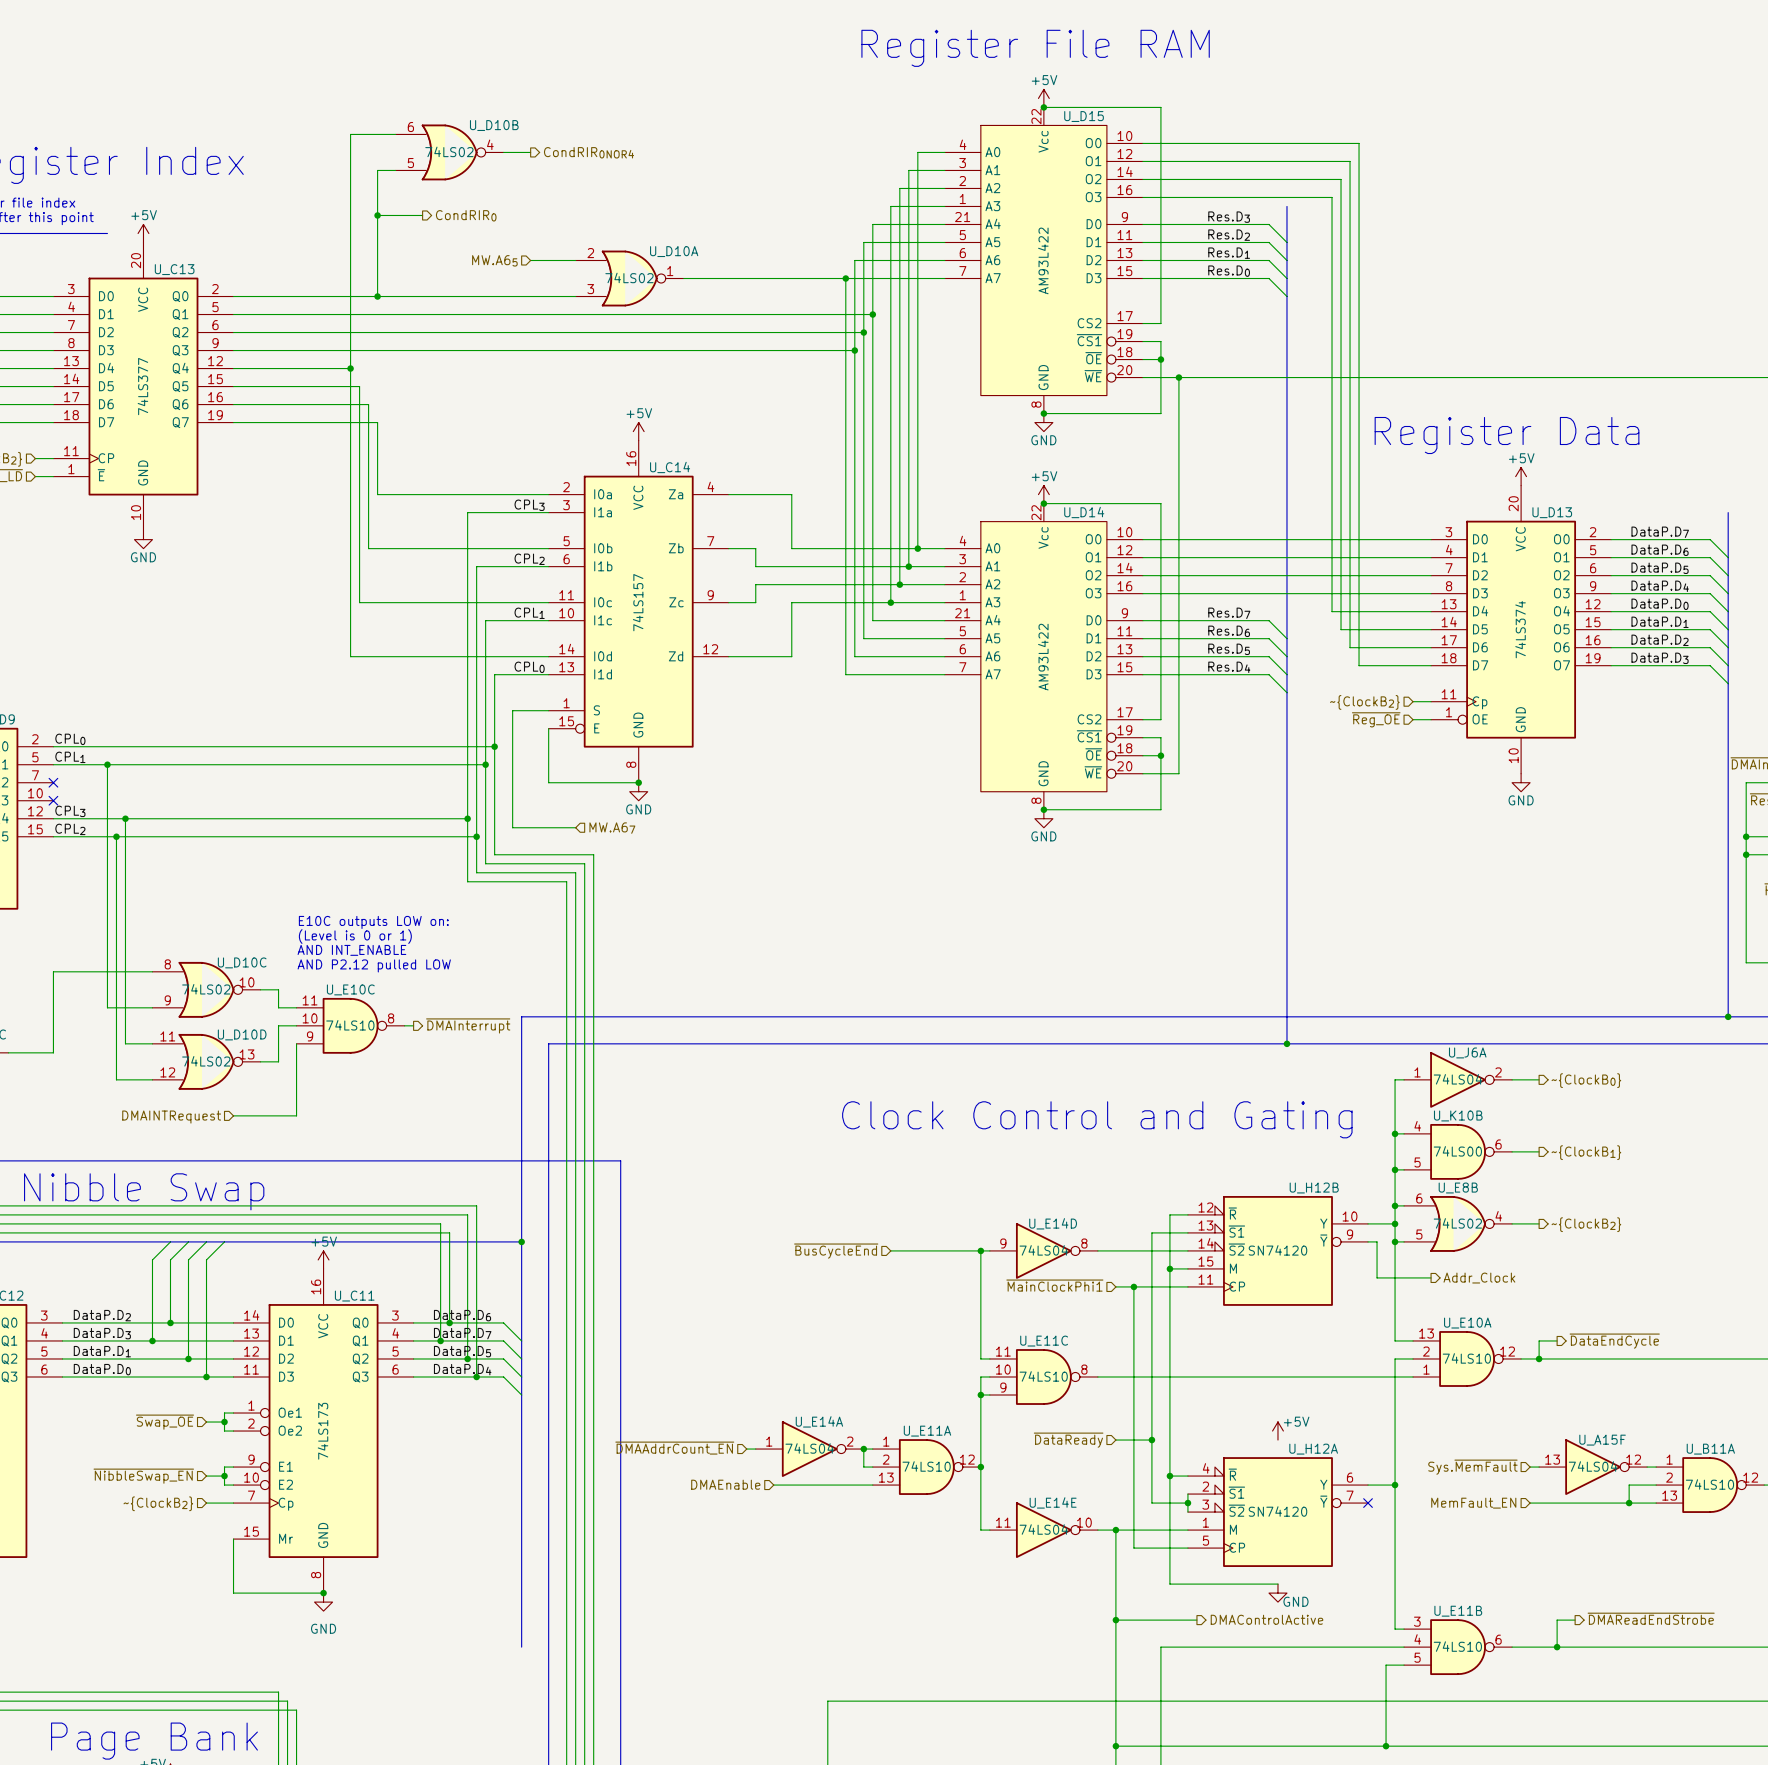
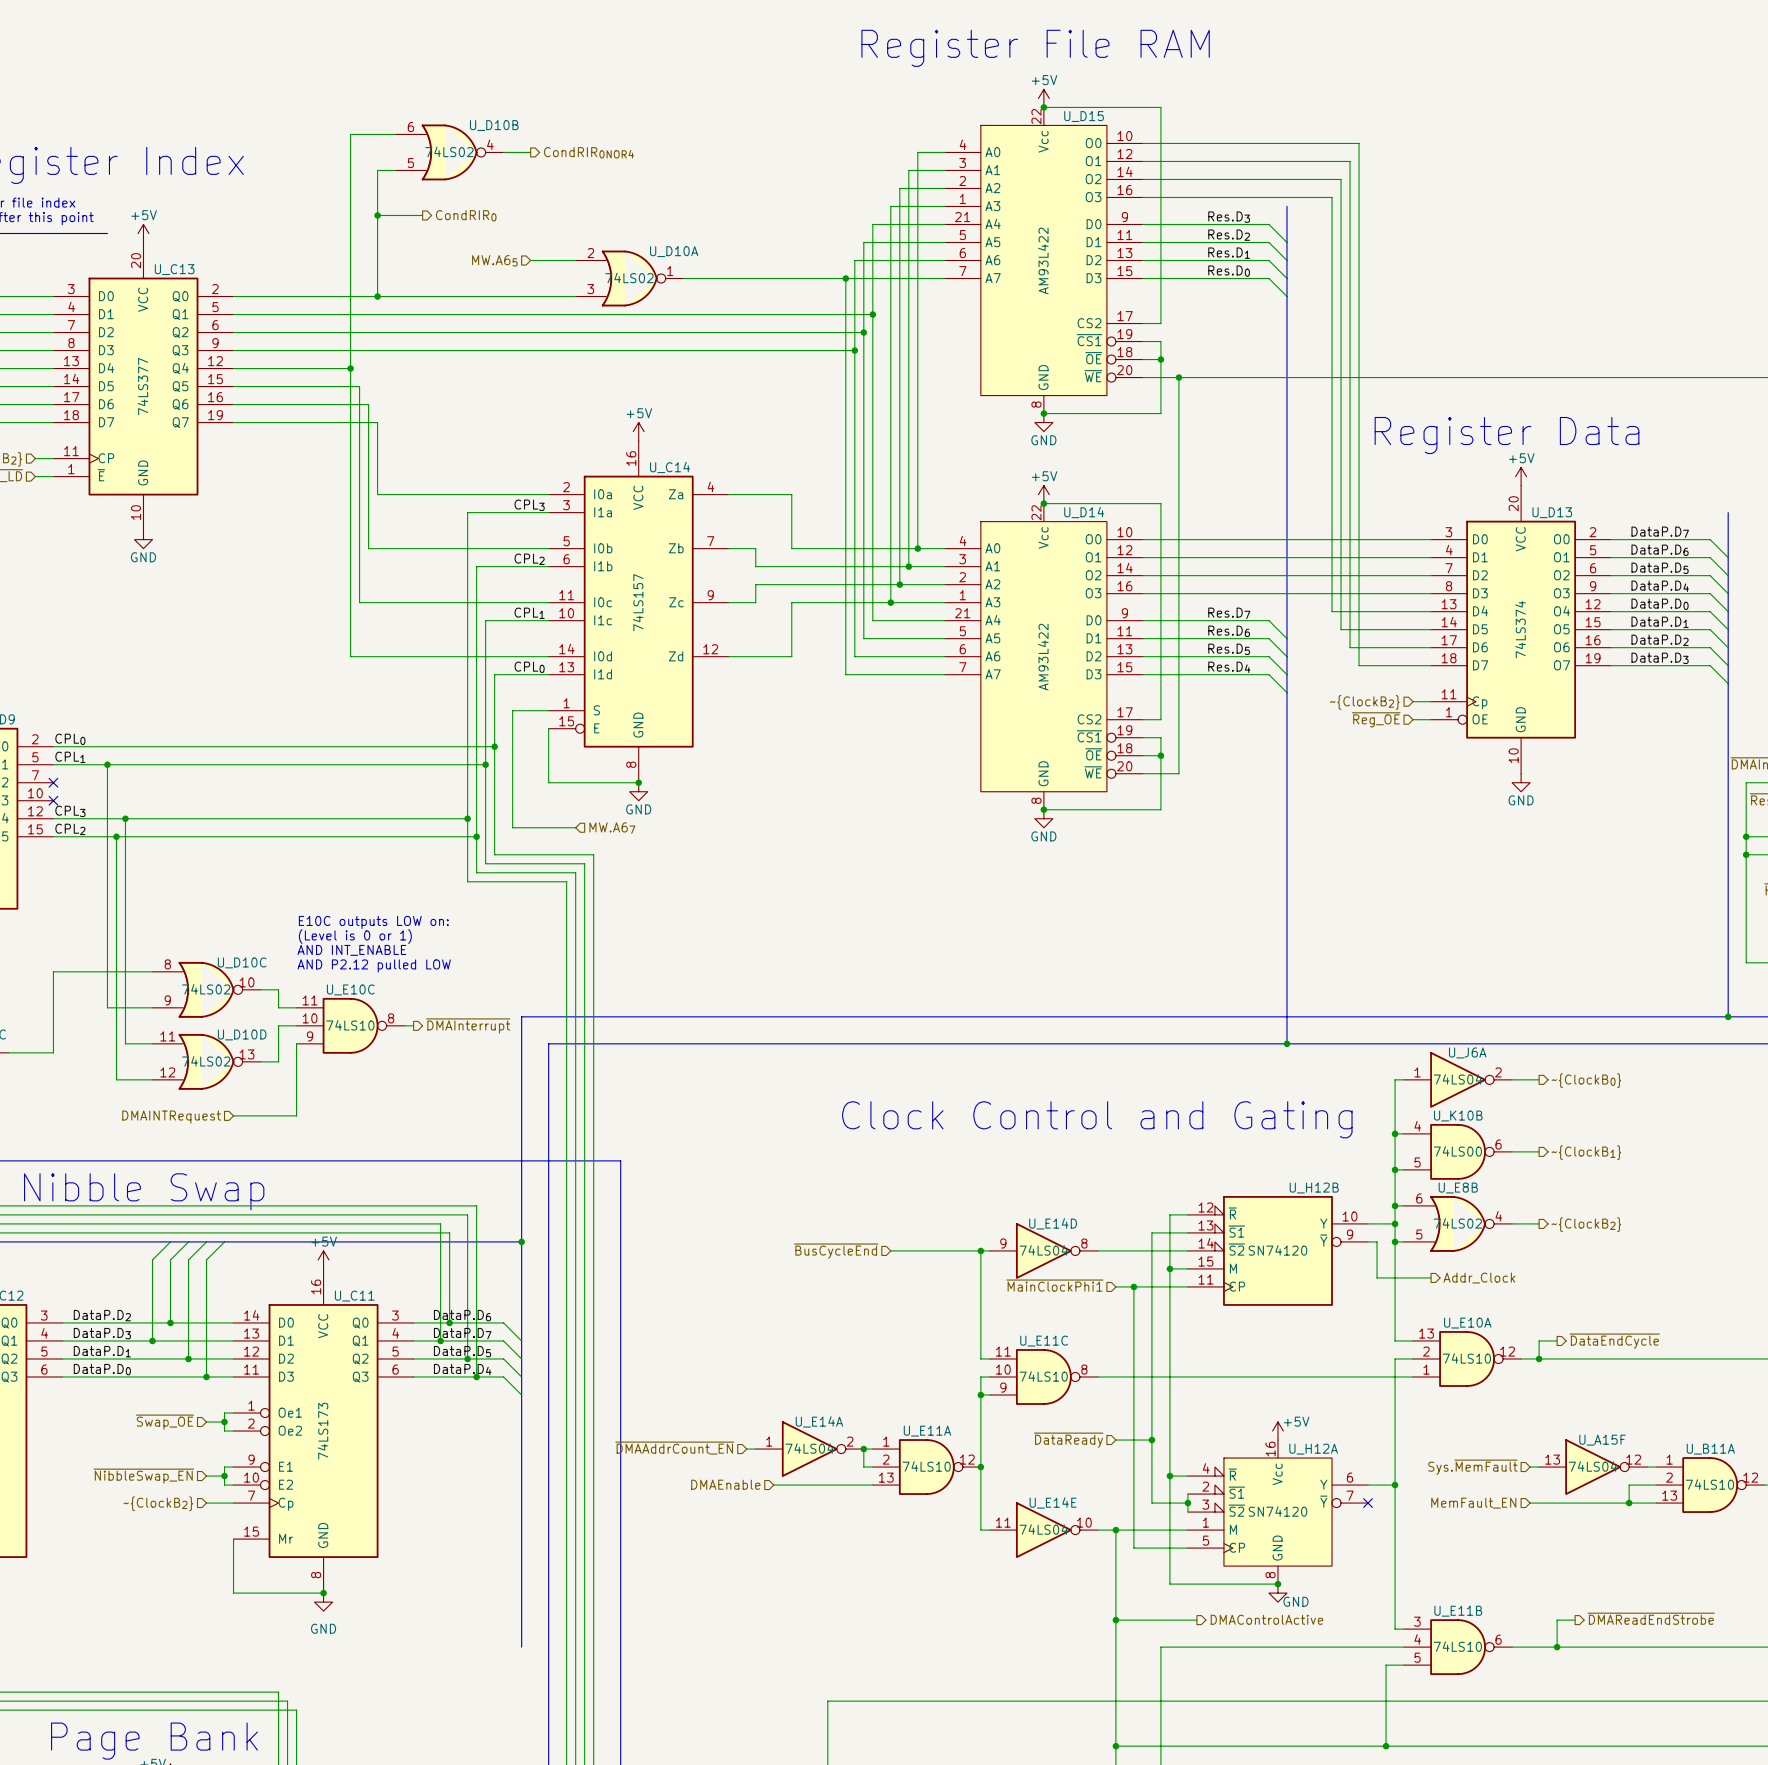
U_H12A symbol: [1187, 1457, 1369, 1567] -> [1187, 1440, 1369, 1585]
junction: none -> (1277, 1584)

